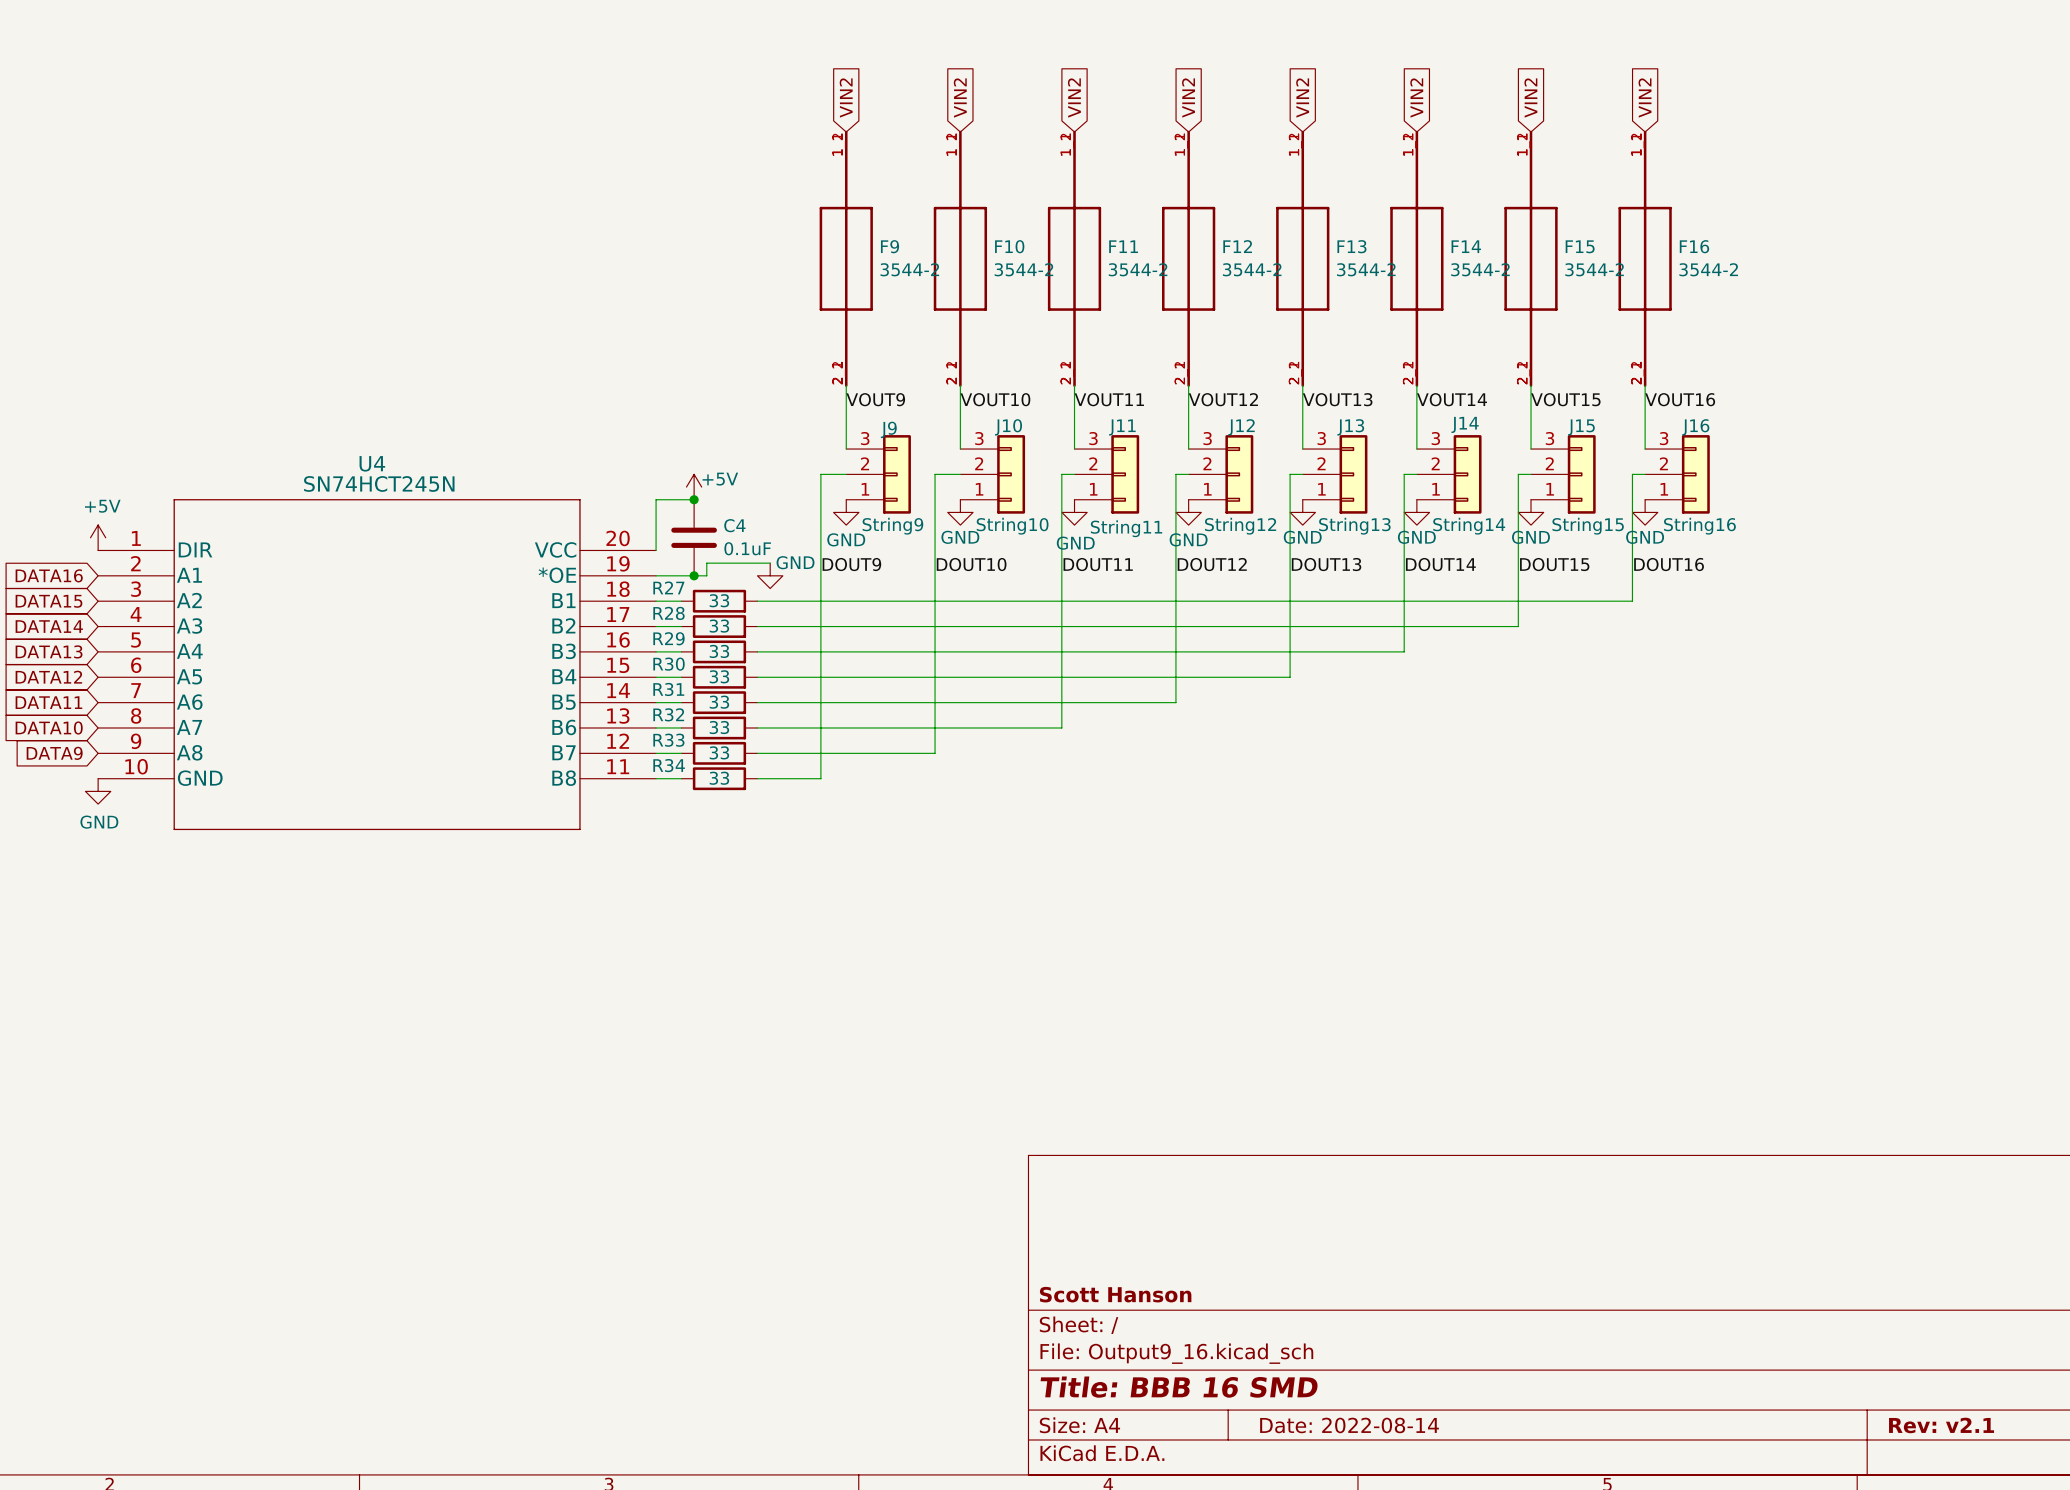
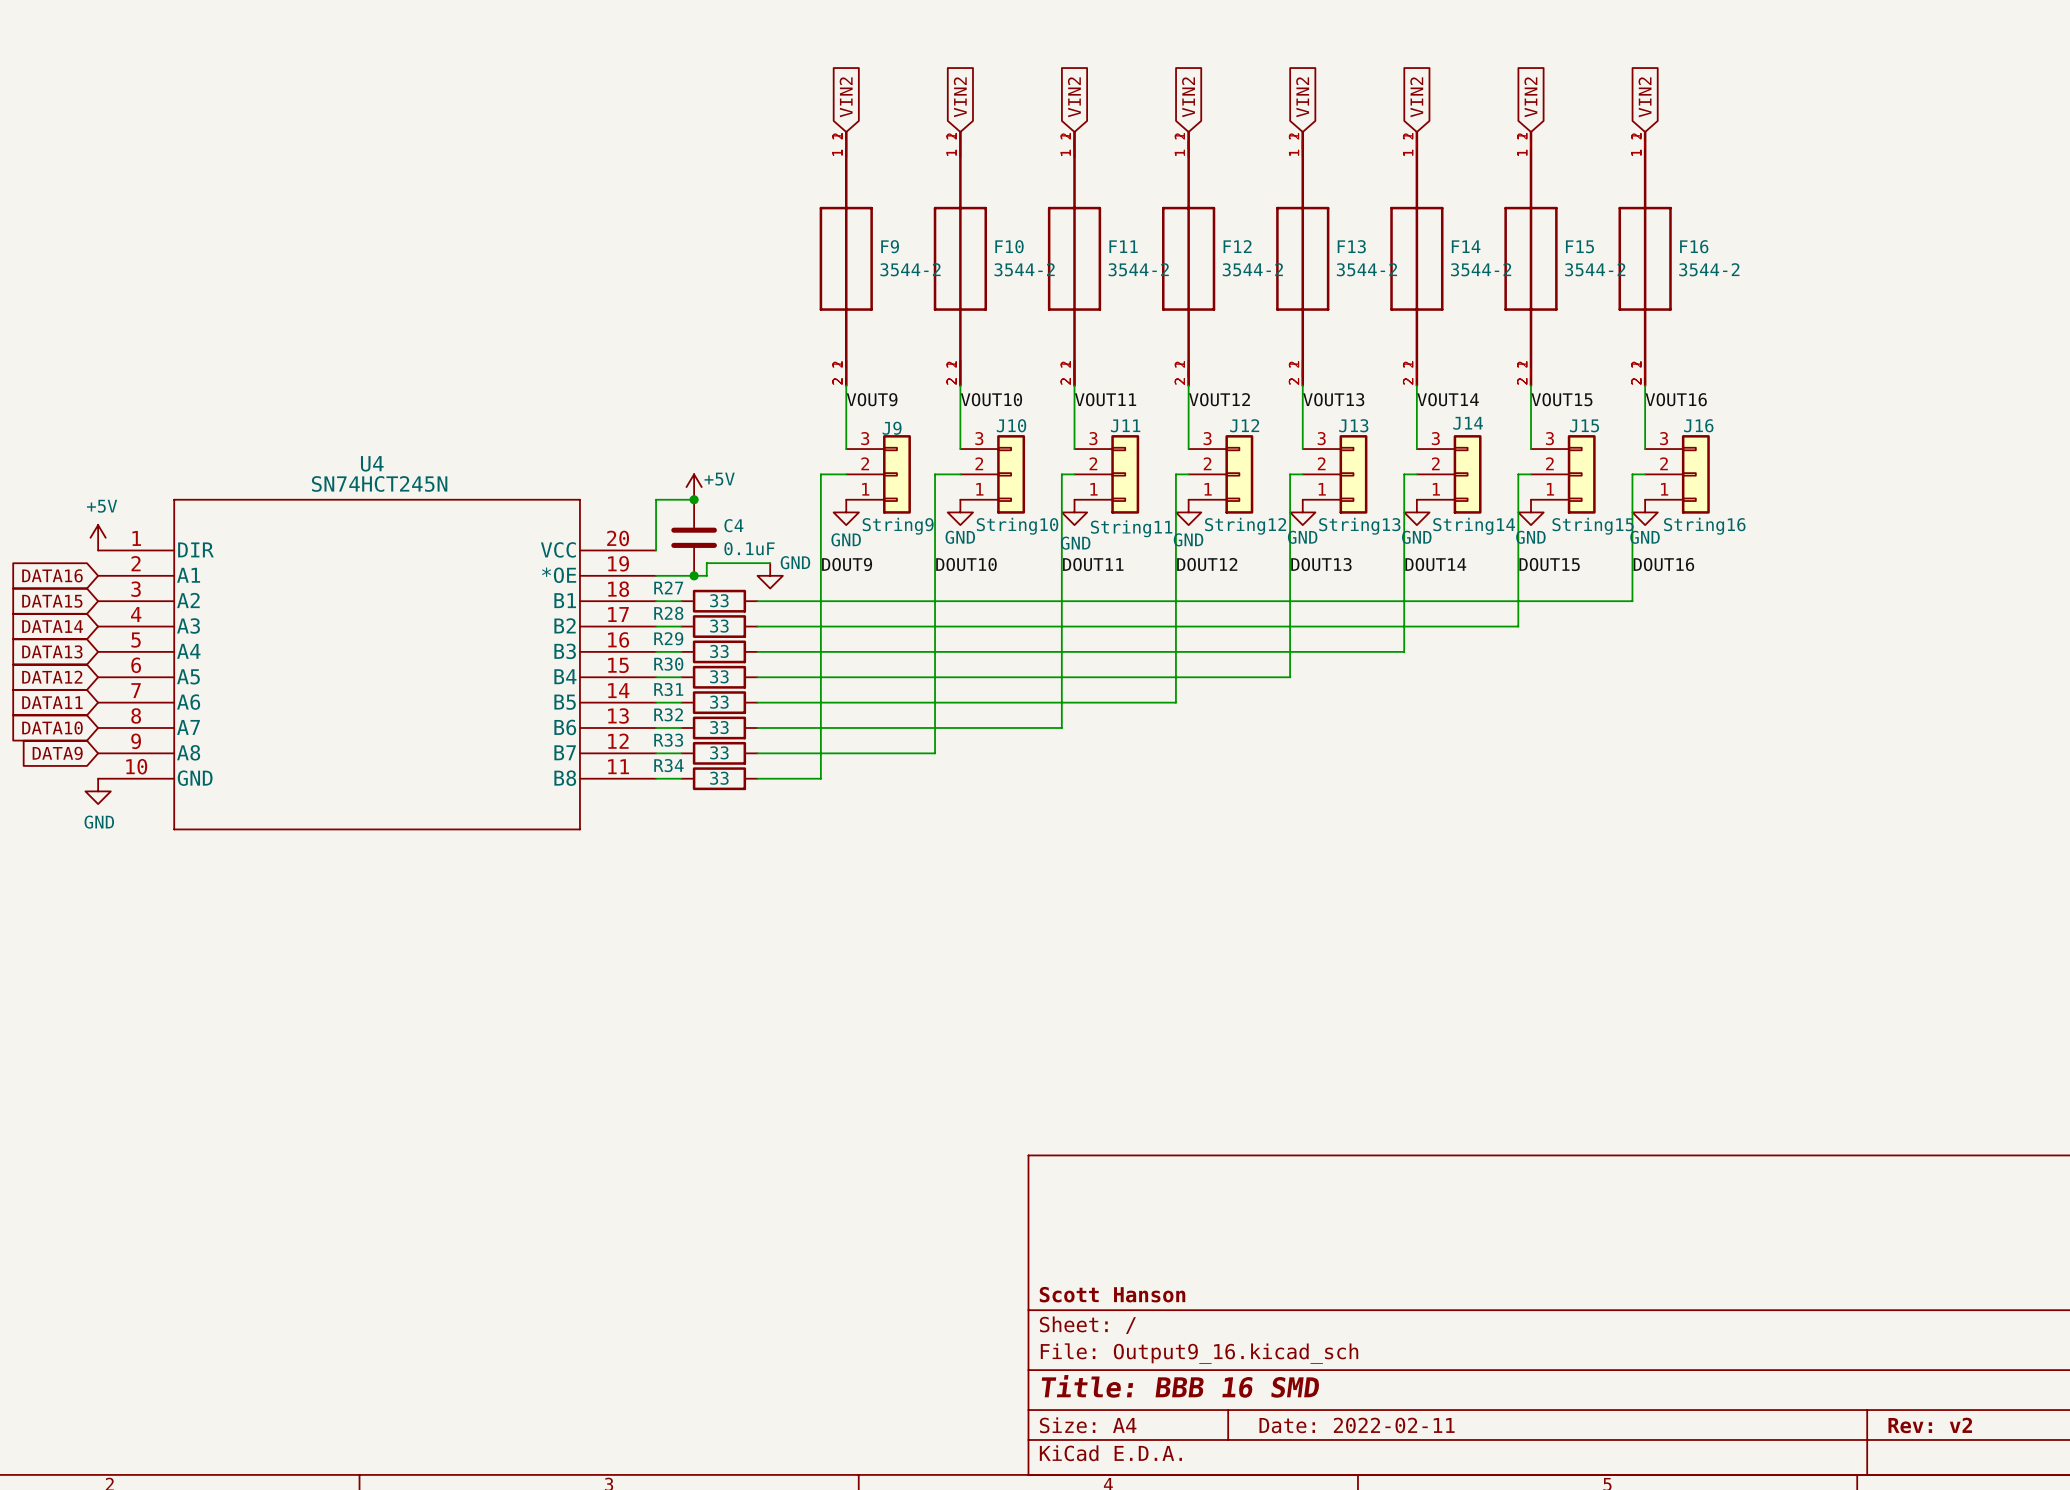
title block: Date: 2022-08-14 (1349, 1425) -> Date: 2022-02-11 (1357, 1425)
title block: Rev: v2.1 (1941, 1425) -> Rev: v2 (1930, 1425)

